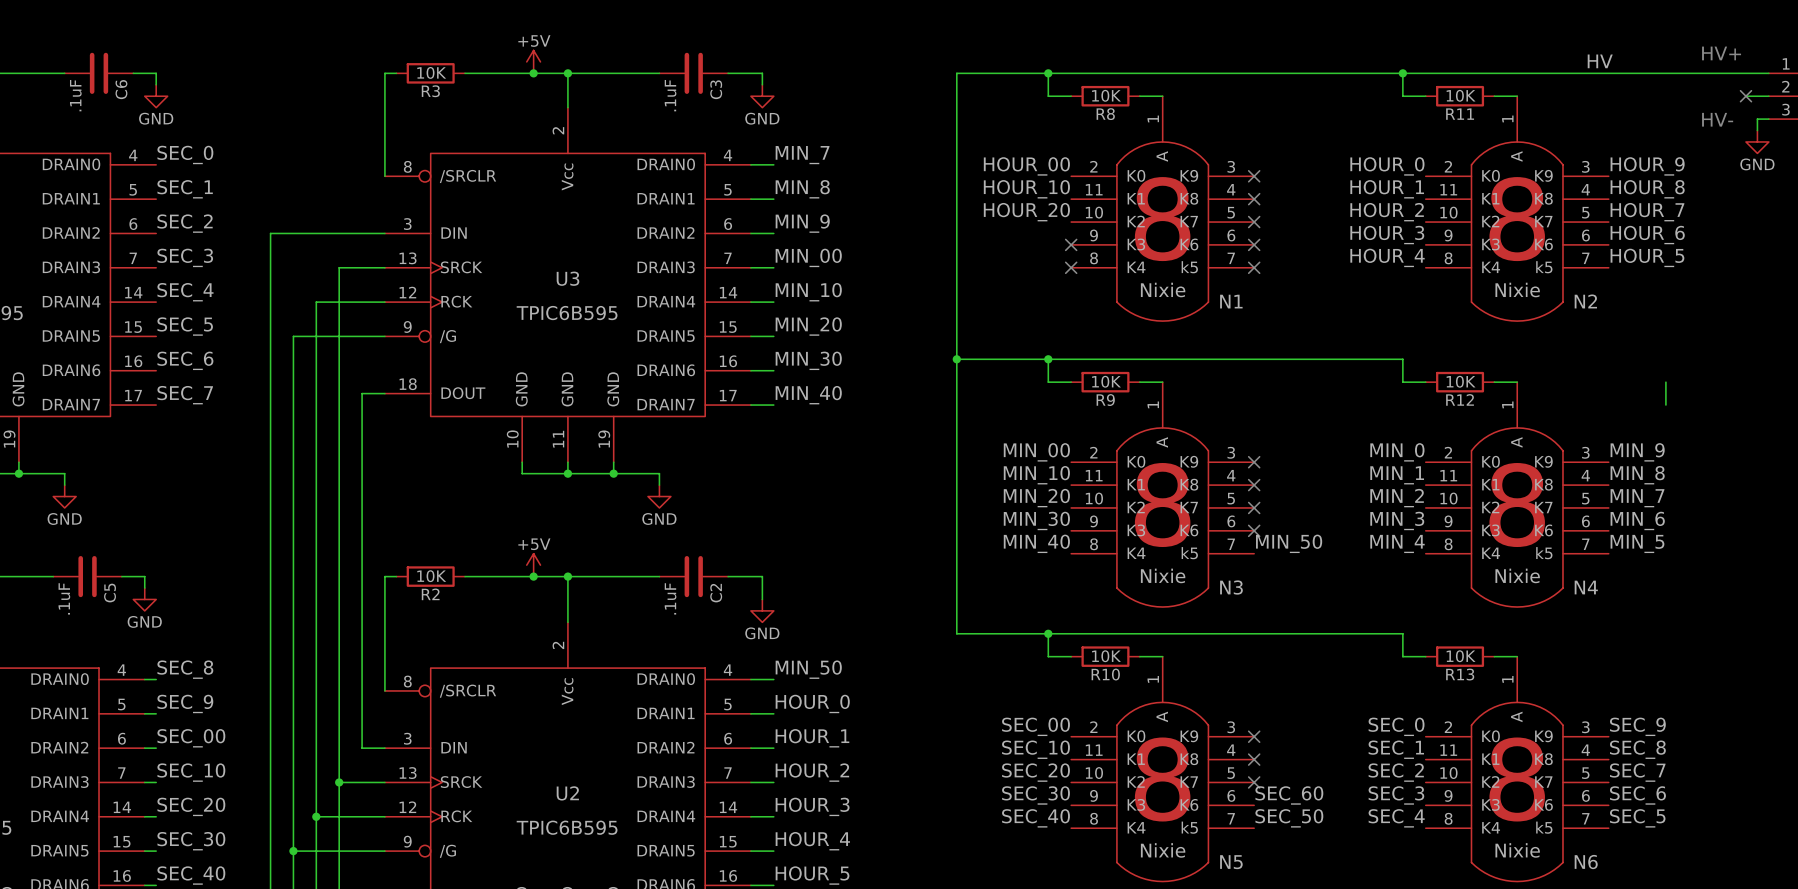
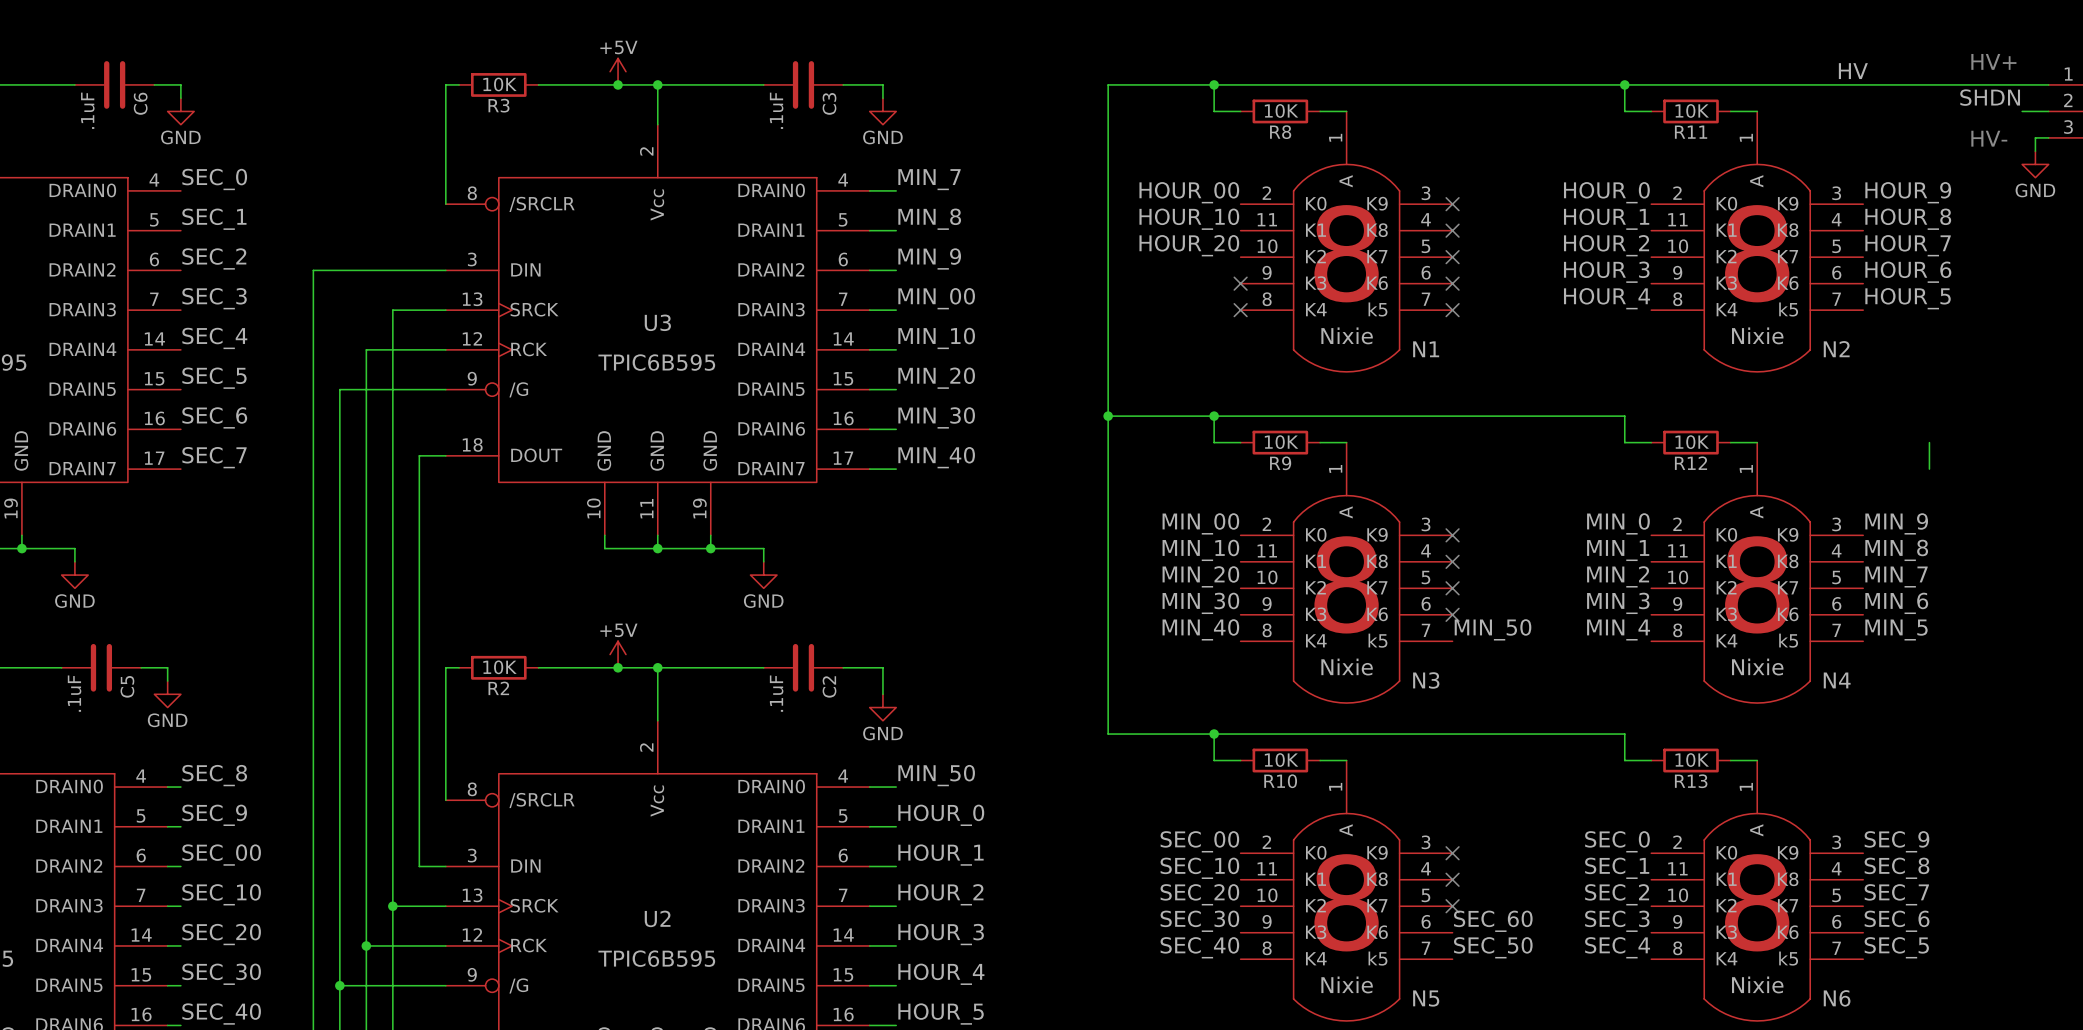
label: none -> SHDN (1990, 97)
no-connect mark: (1745, 96) -> none

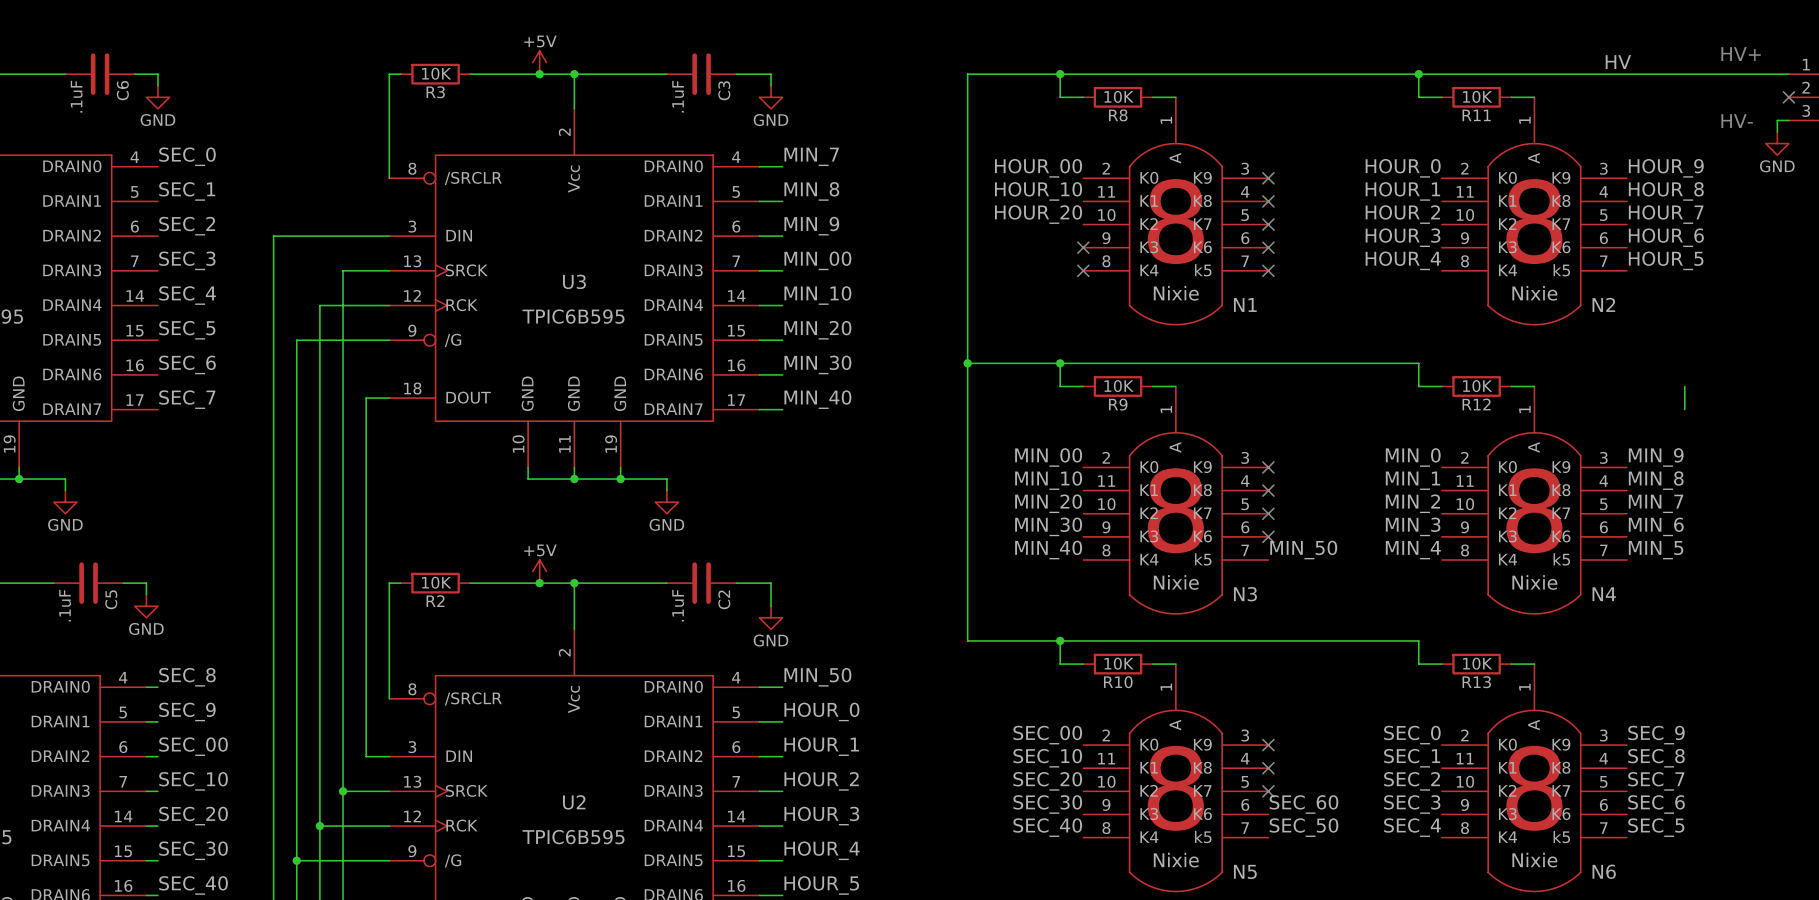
label: SHDN (1990, 97) -> none
wire: (2022, 111) (2048, 111) -> none
no-connect mark: none -> (1788, 97)

